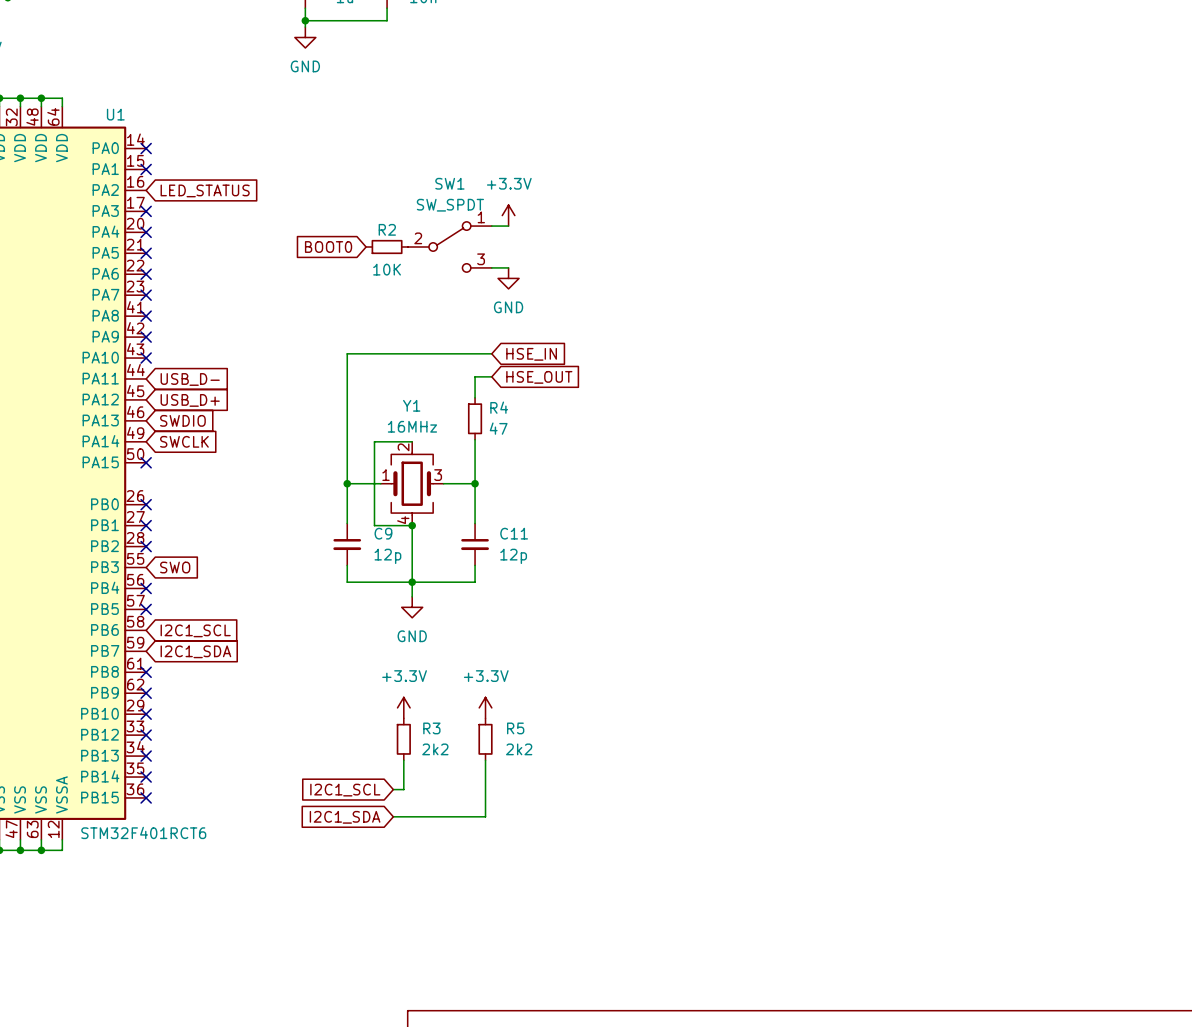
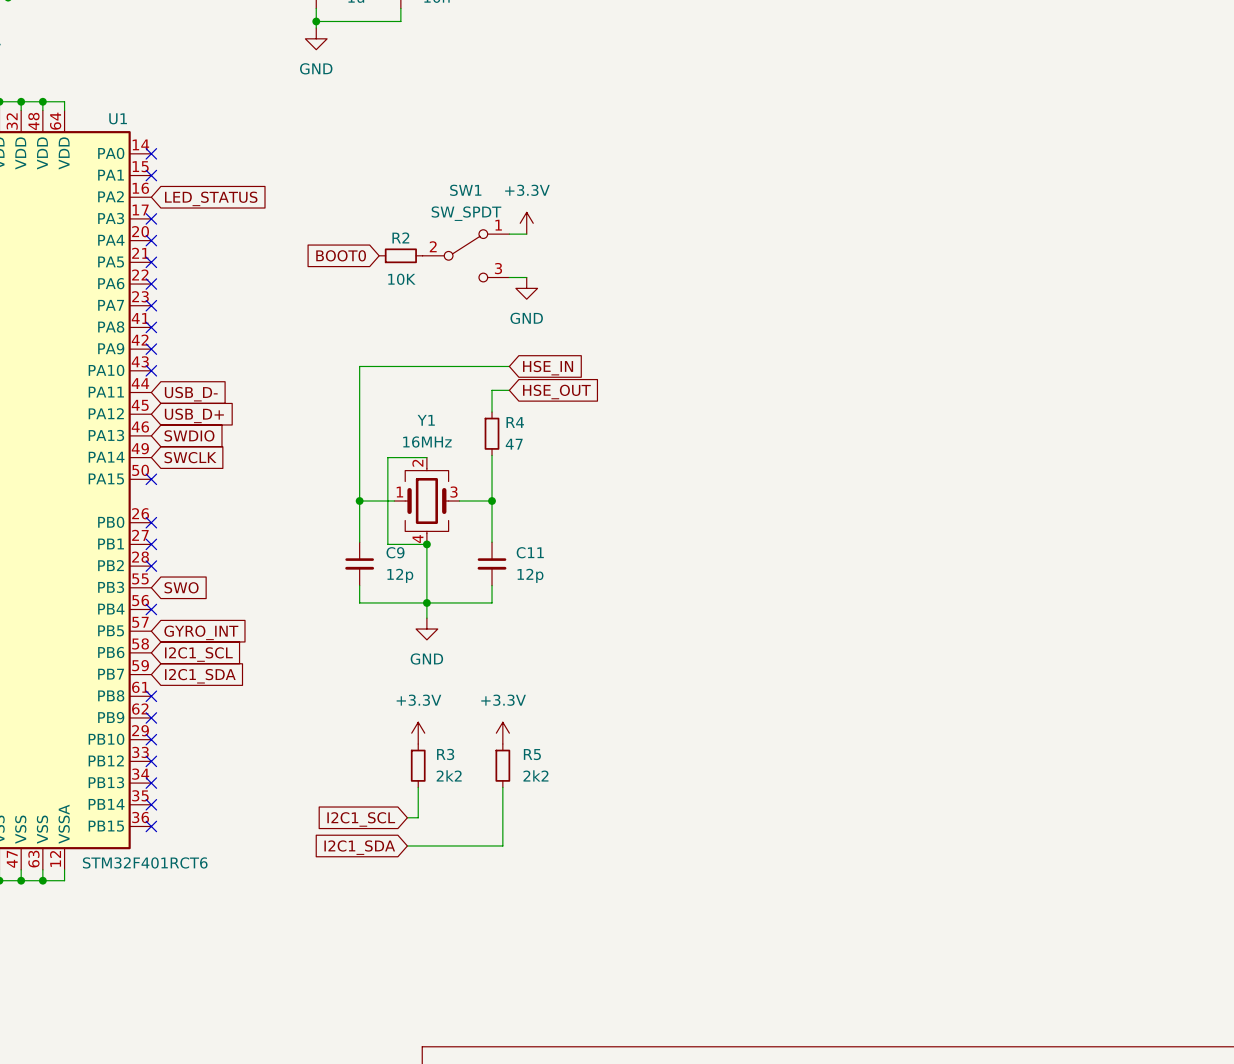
no-connect mark: (146, 609) -> none
global label: none -> GYRO_INT (201, 632)

